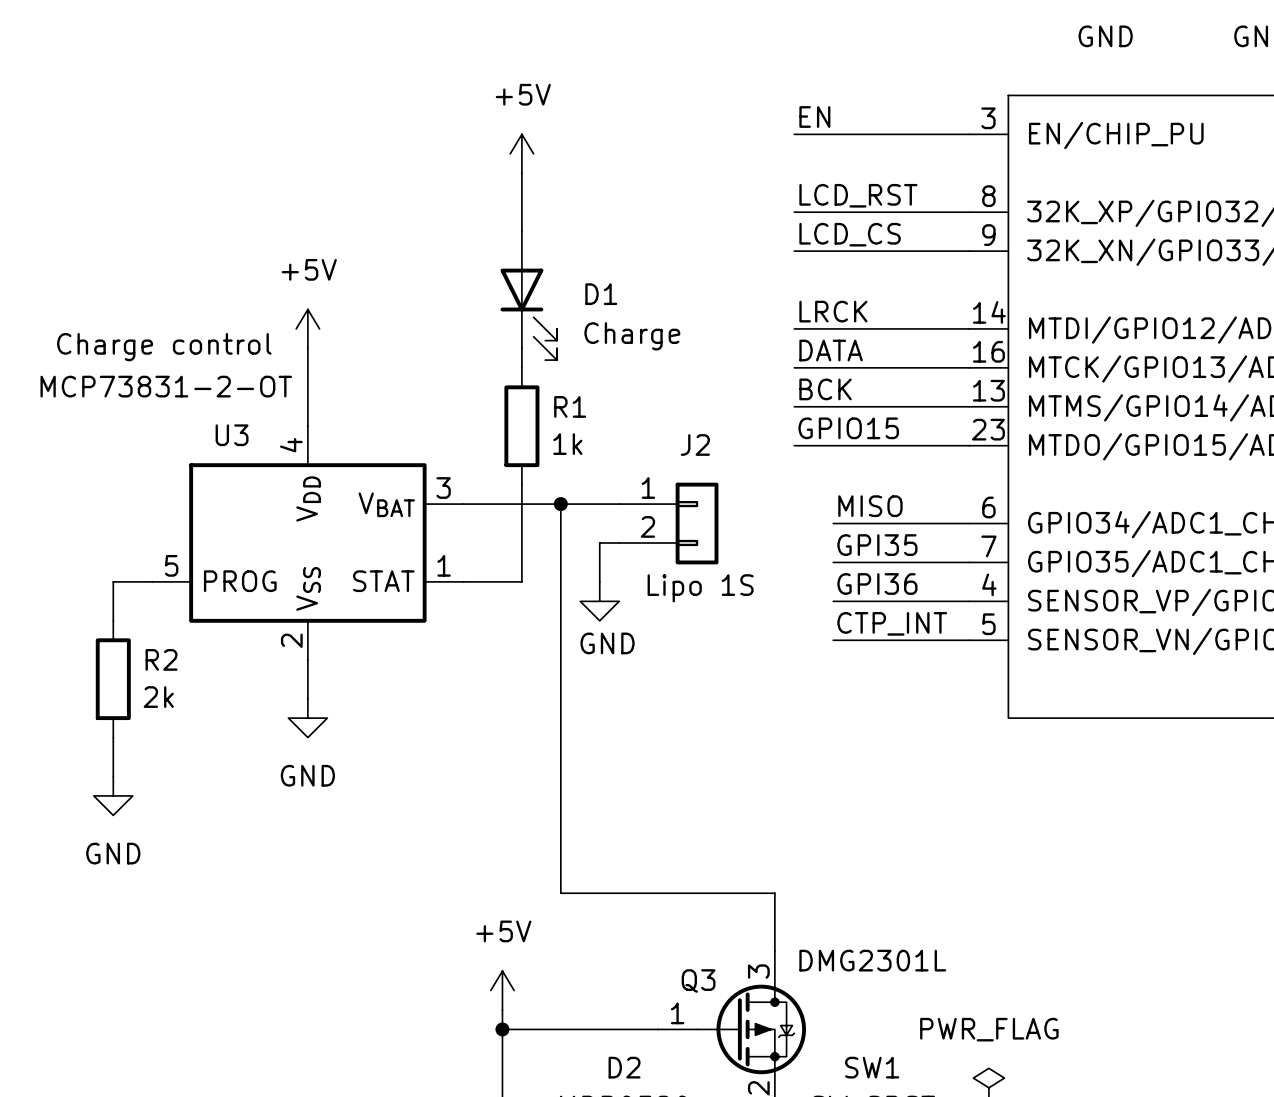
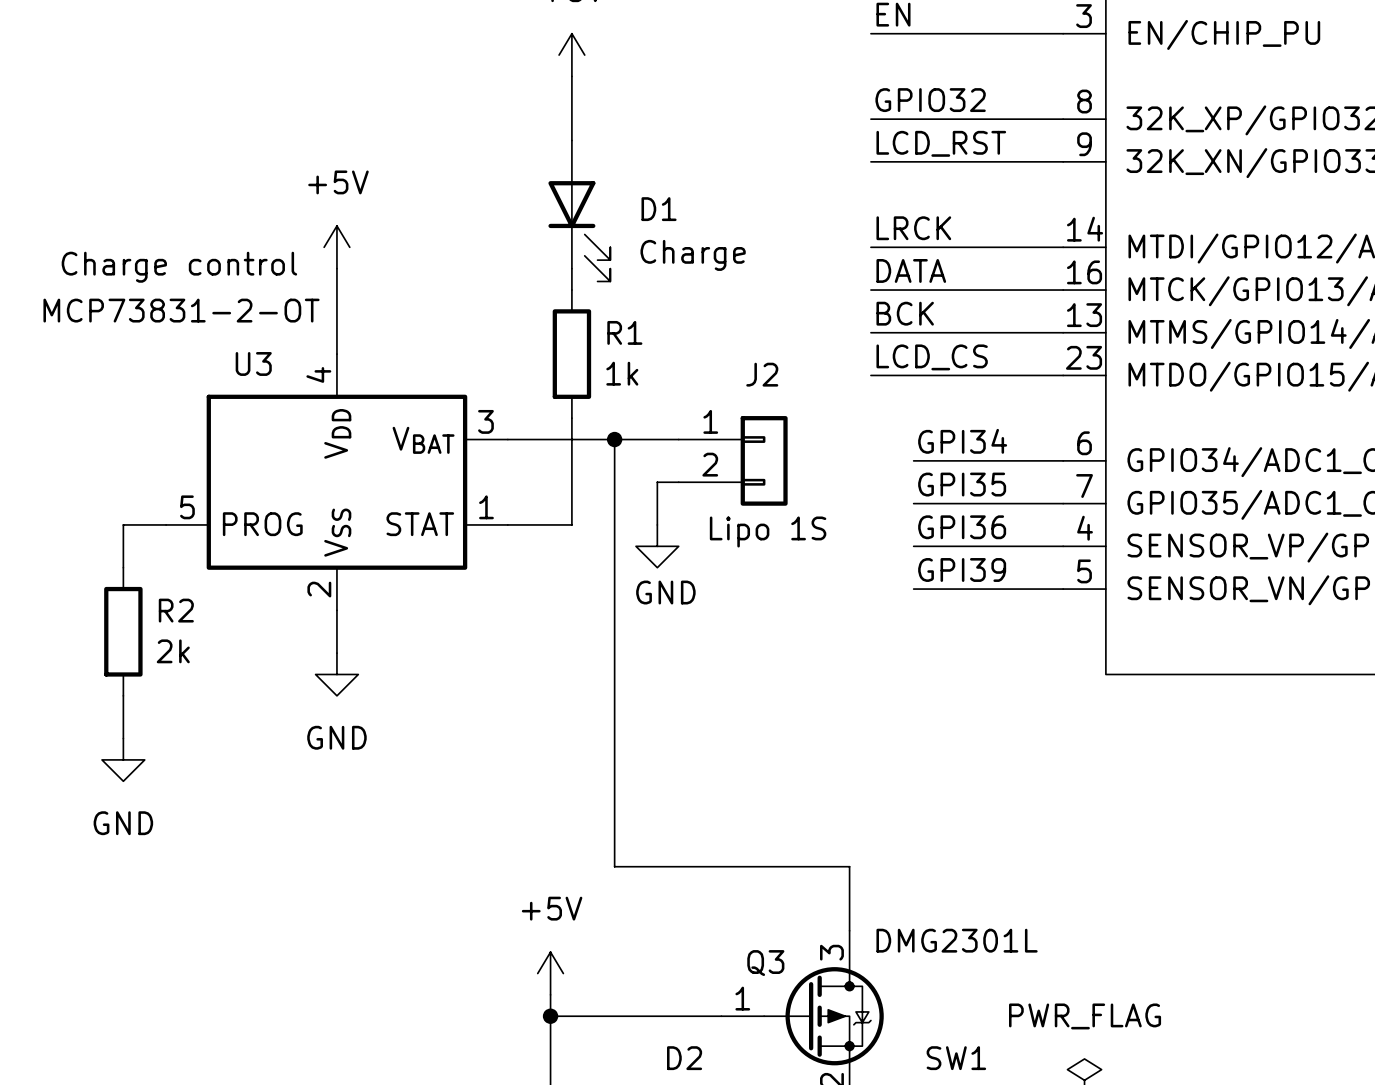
label: LCD_RST (858, 195) -> GPIO32 (930, 100)
label: LCD_CS (850, 234) -> LCD_RST (941, 143)
label: GPIO15 (848, 428) -> LCD_CS (932, 357)
label: MISO (870, 506) -> GPI34 (962, 441)
label: CTP_INT (892, 623) -> GPI39 (962, 569)

